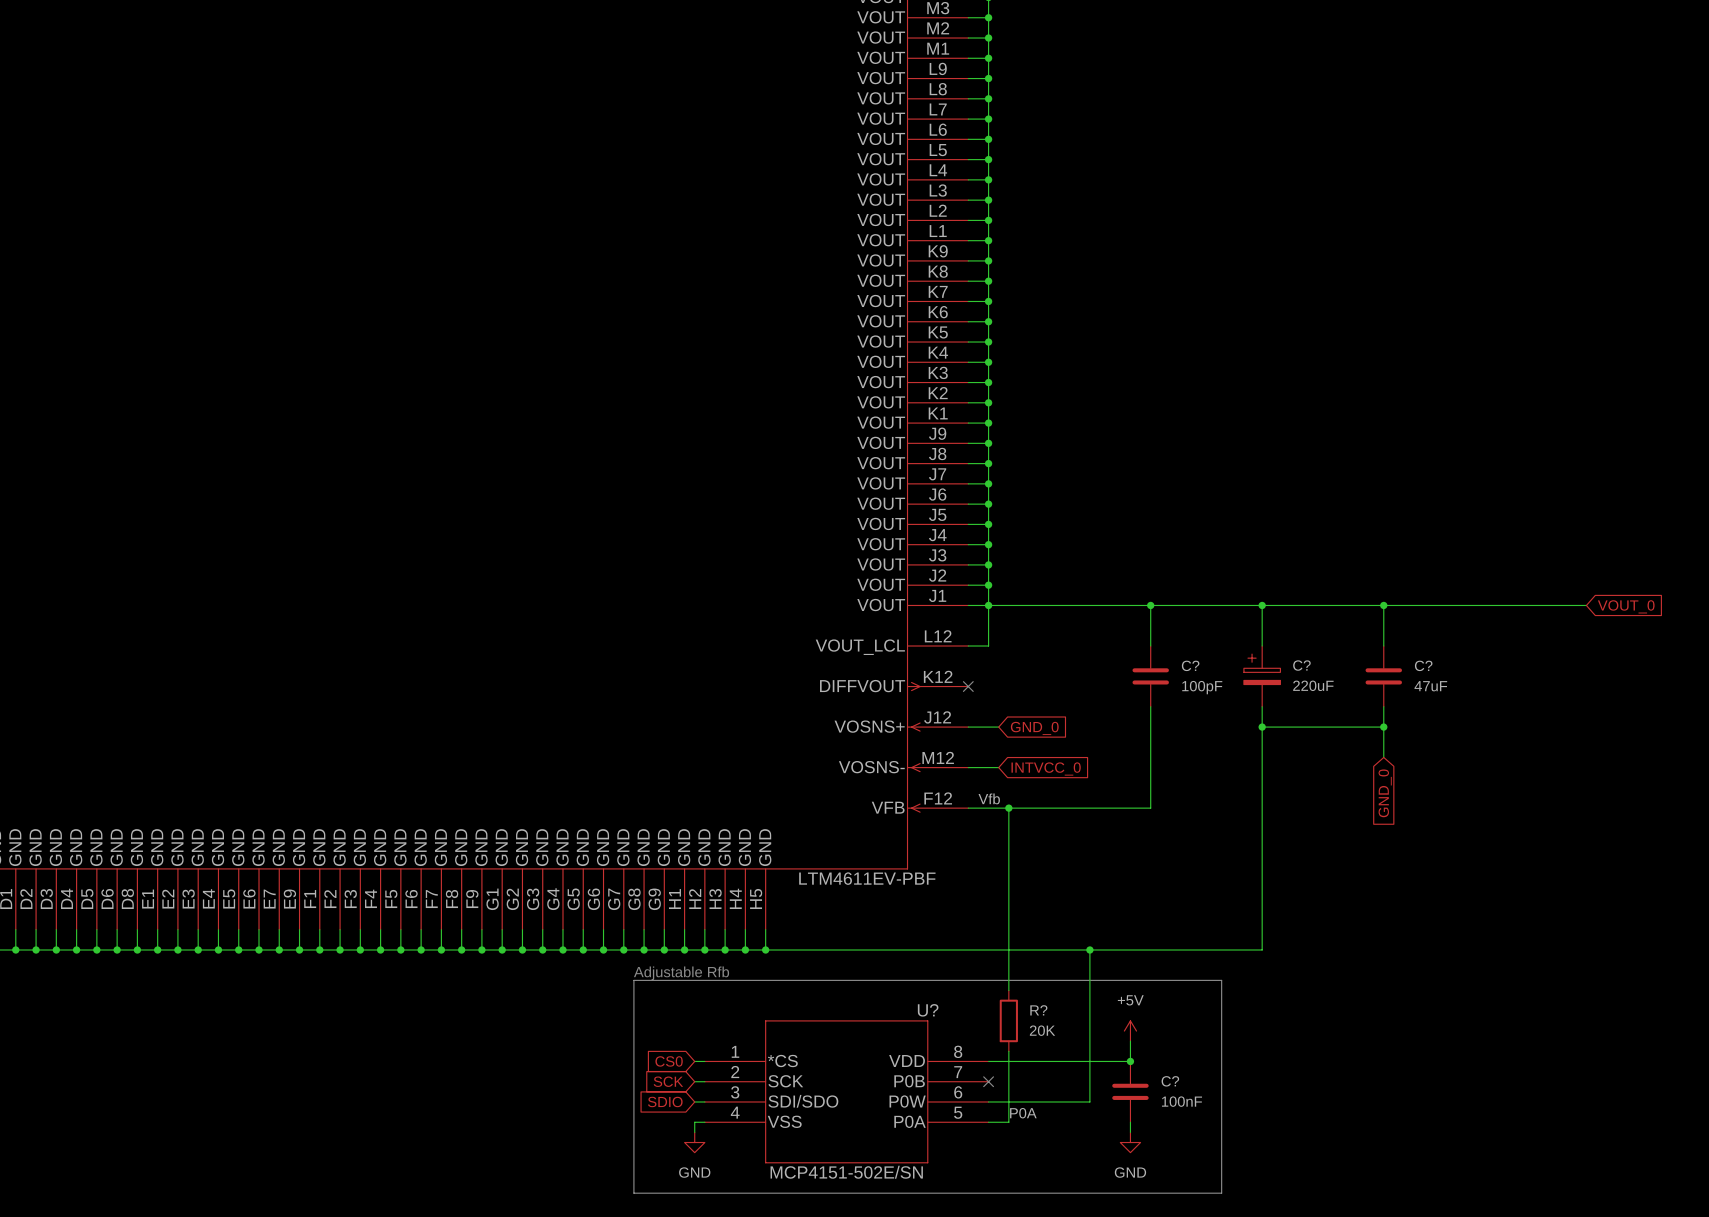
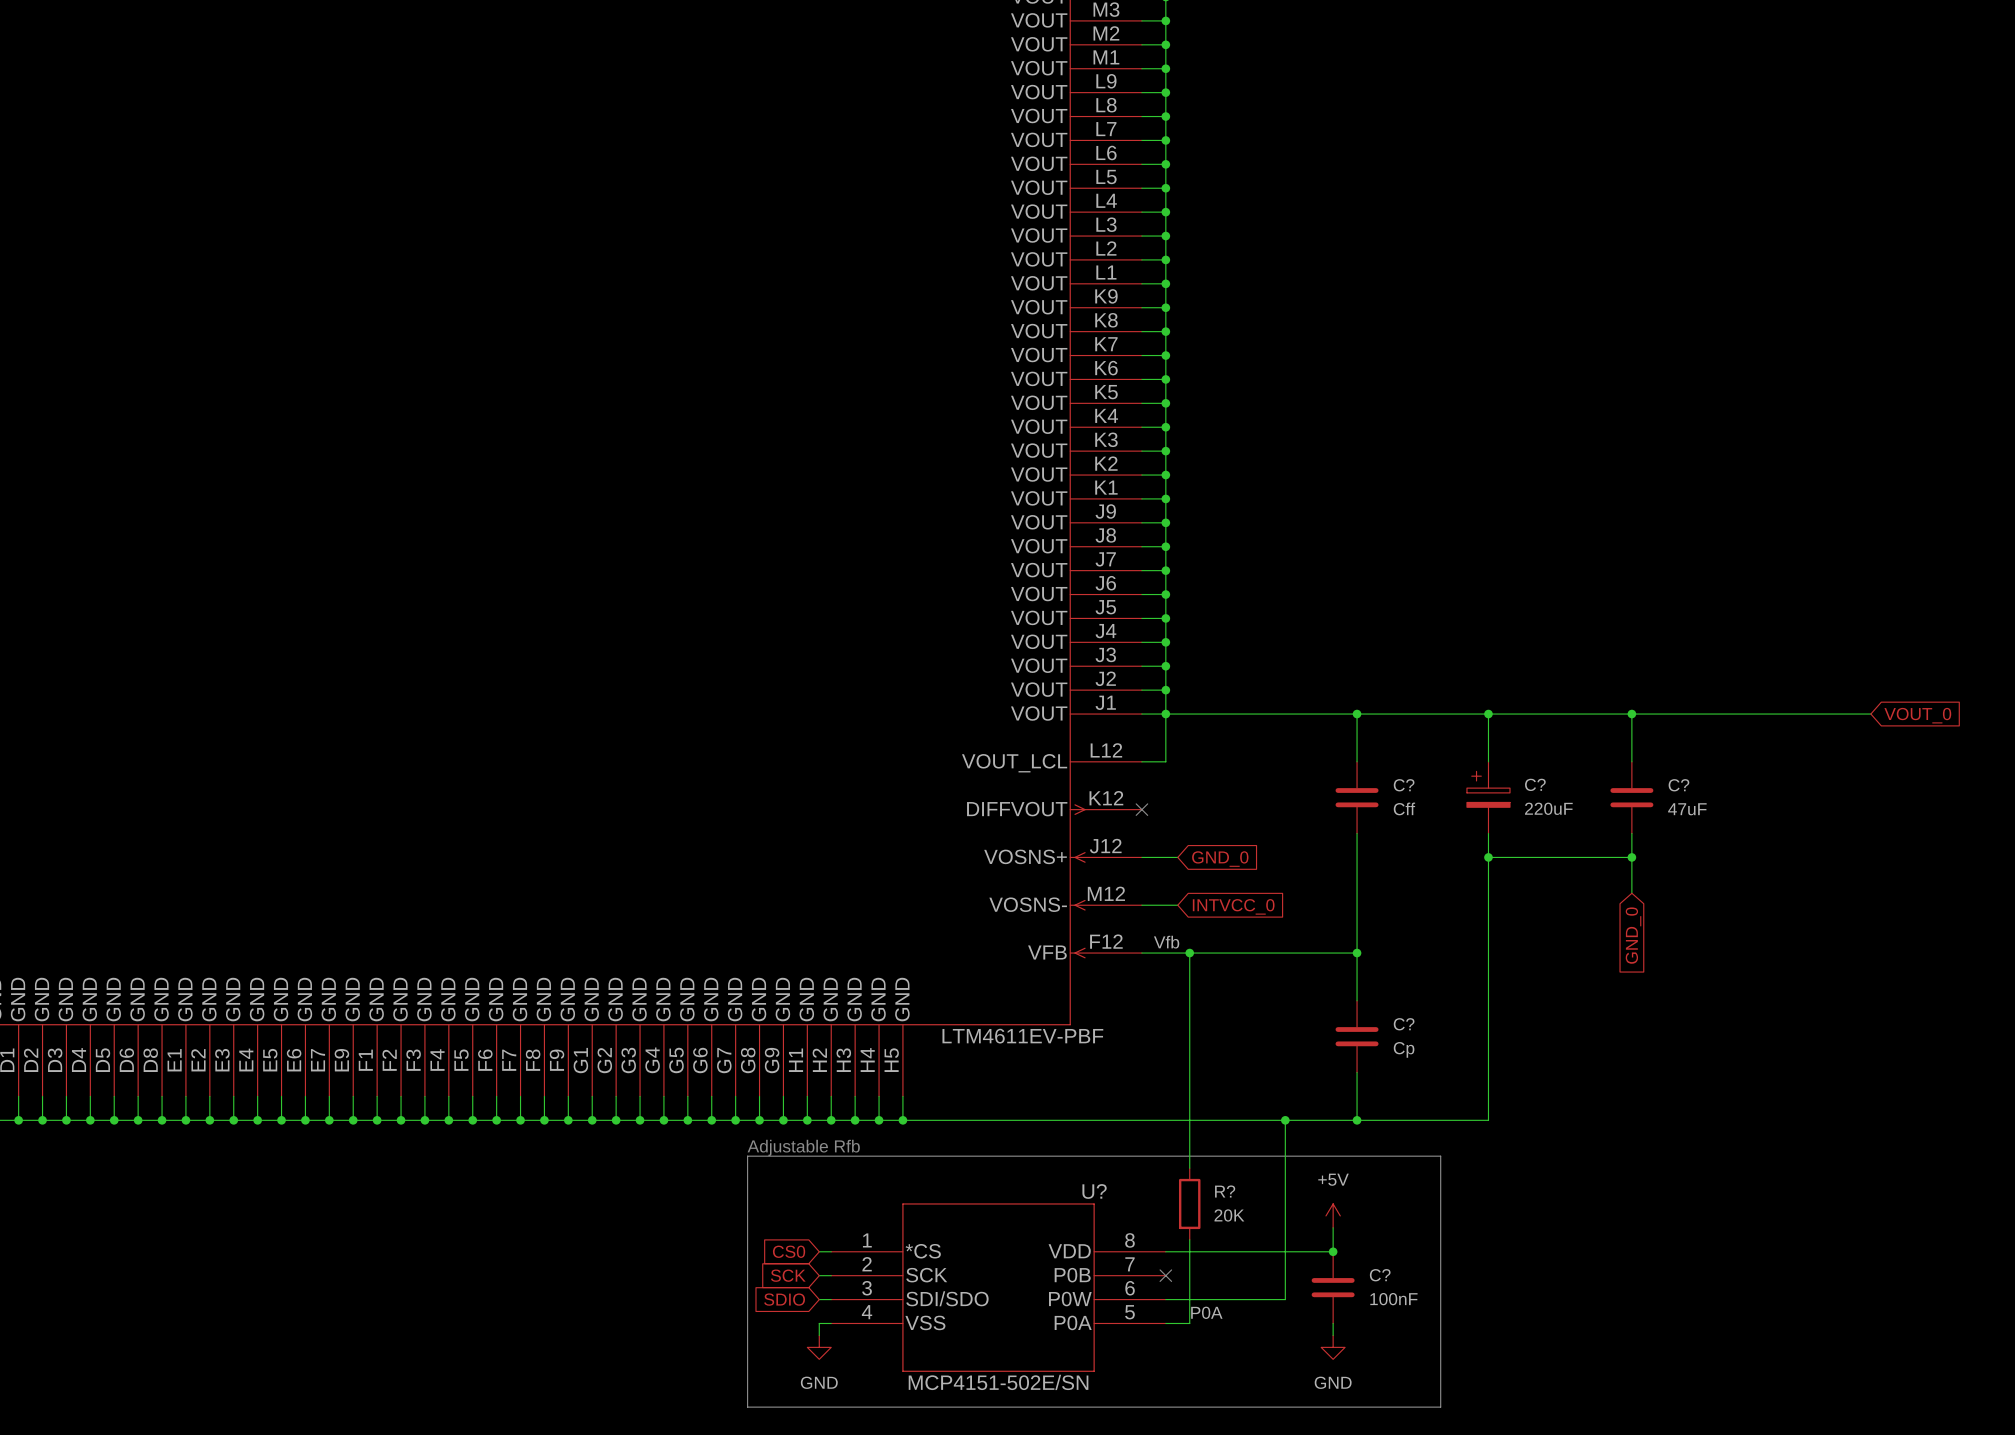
C? value: 100pF (1202, 687) -> Cff (1404, 808)
wire: none -> (1357, 953) (1357, 1000)
junction: none -> (1357, 953)
C?: none -> Cp (1357, 1036)
wire: none -> (1357, 1072) (1357, 1120)
junction: none -> (1357, 1120)

